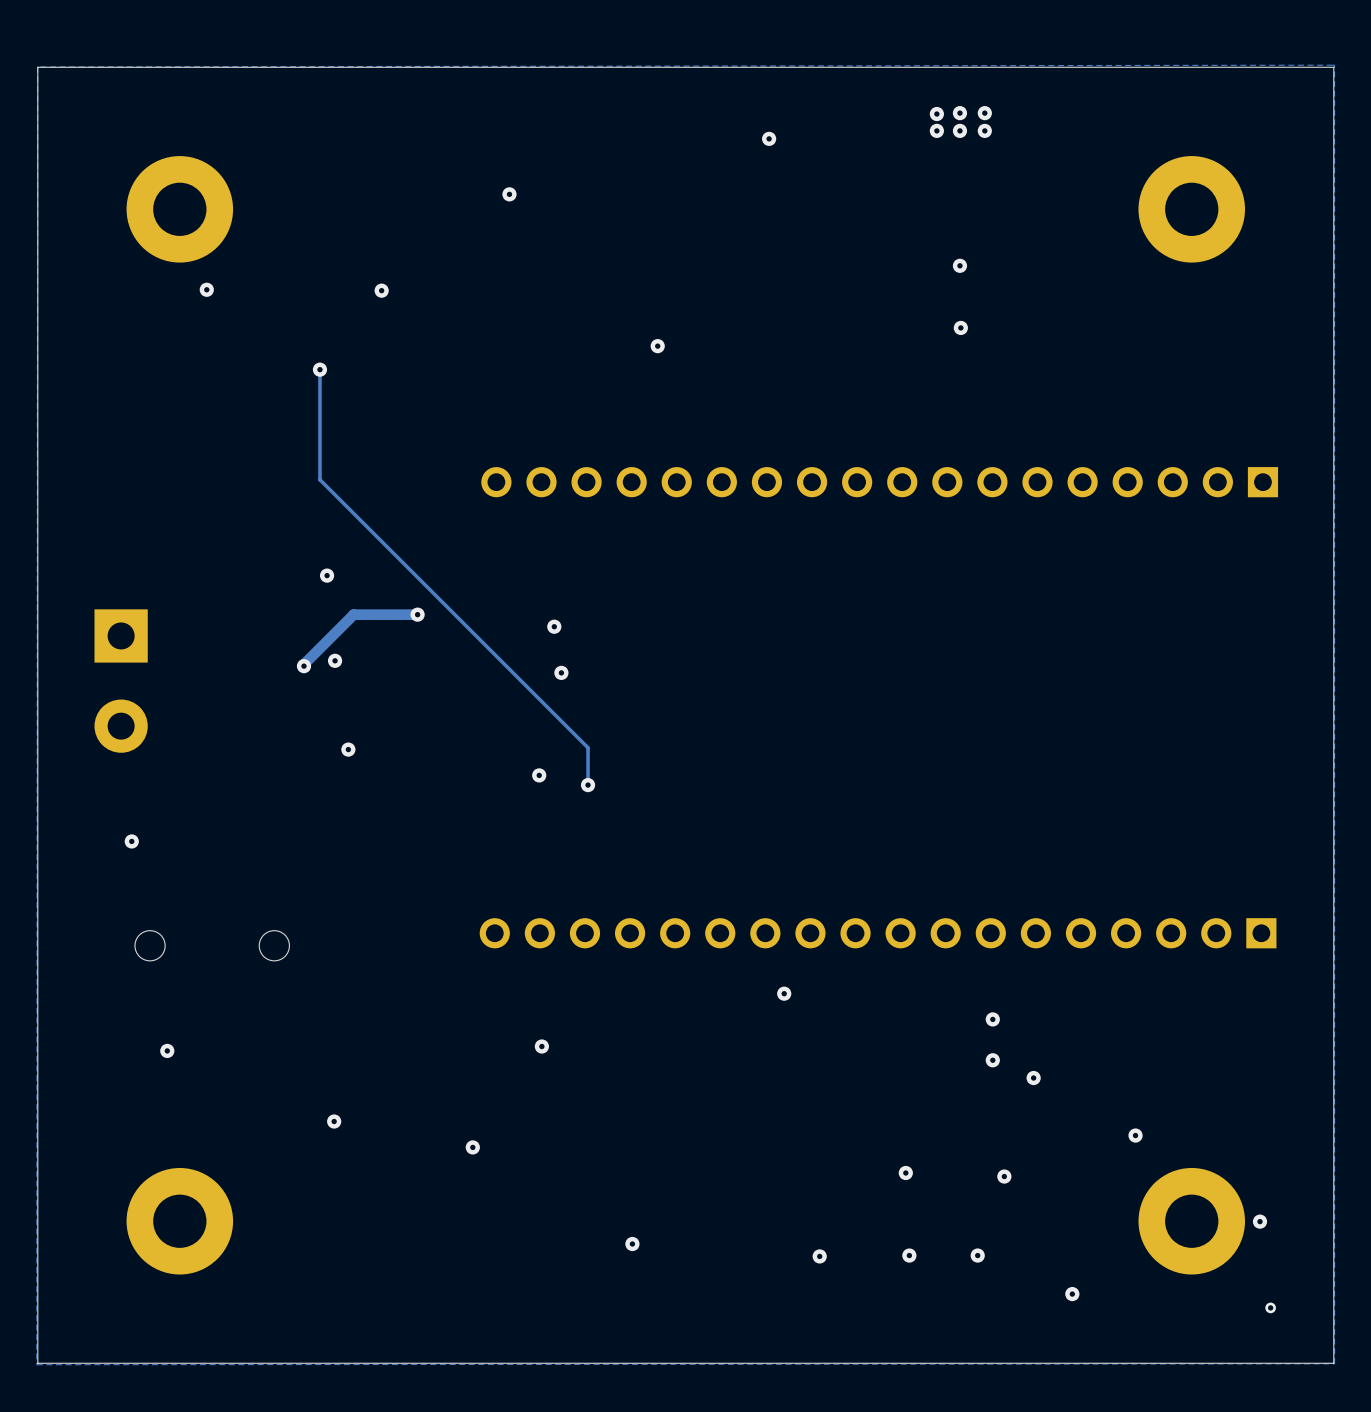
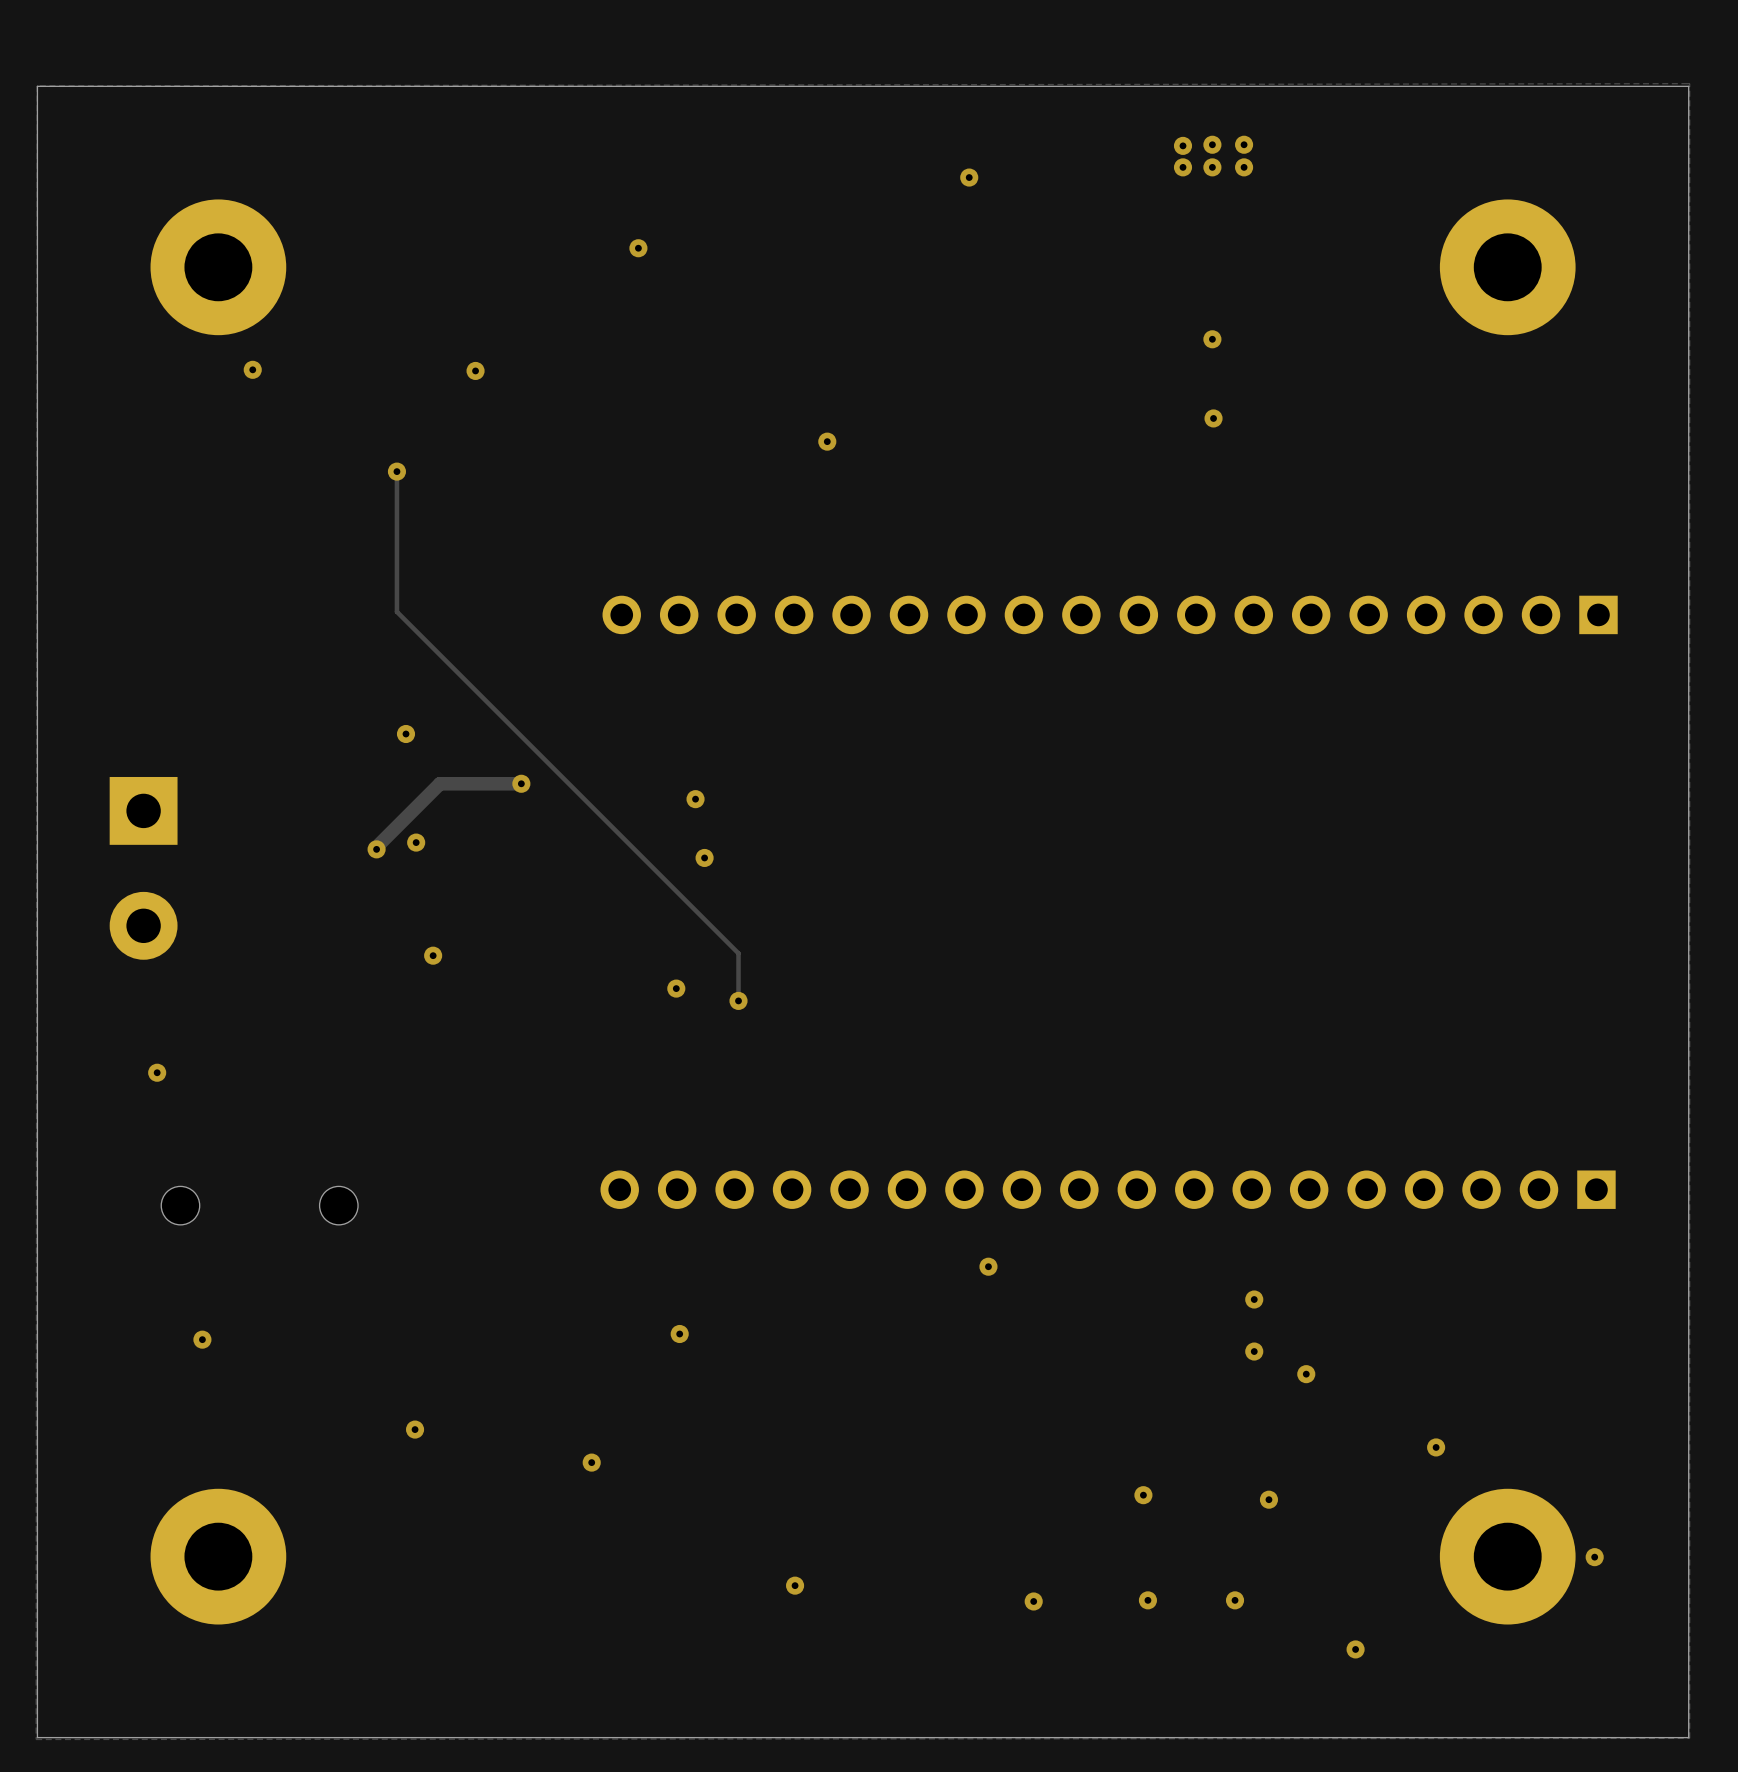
via: (1270, 1307) -> none

